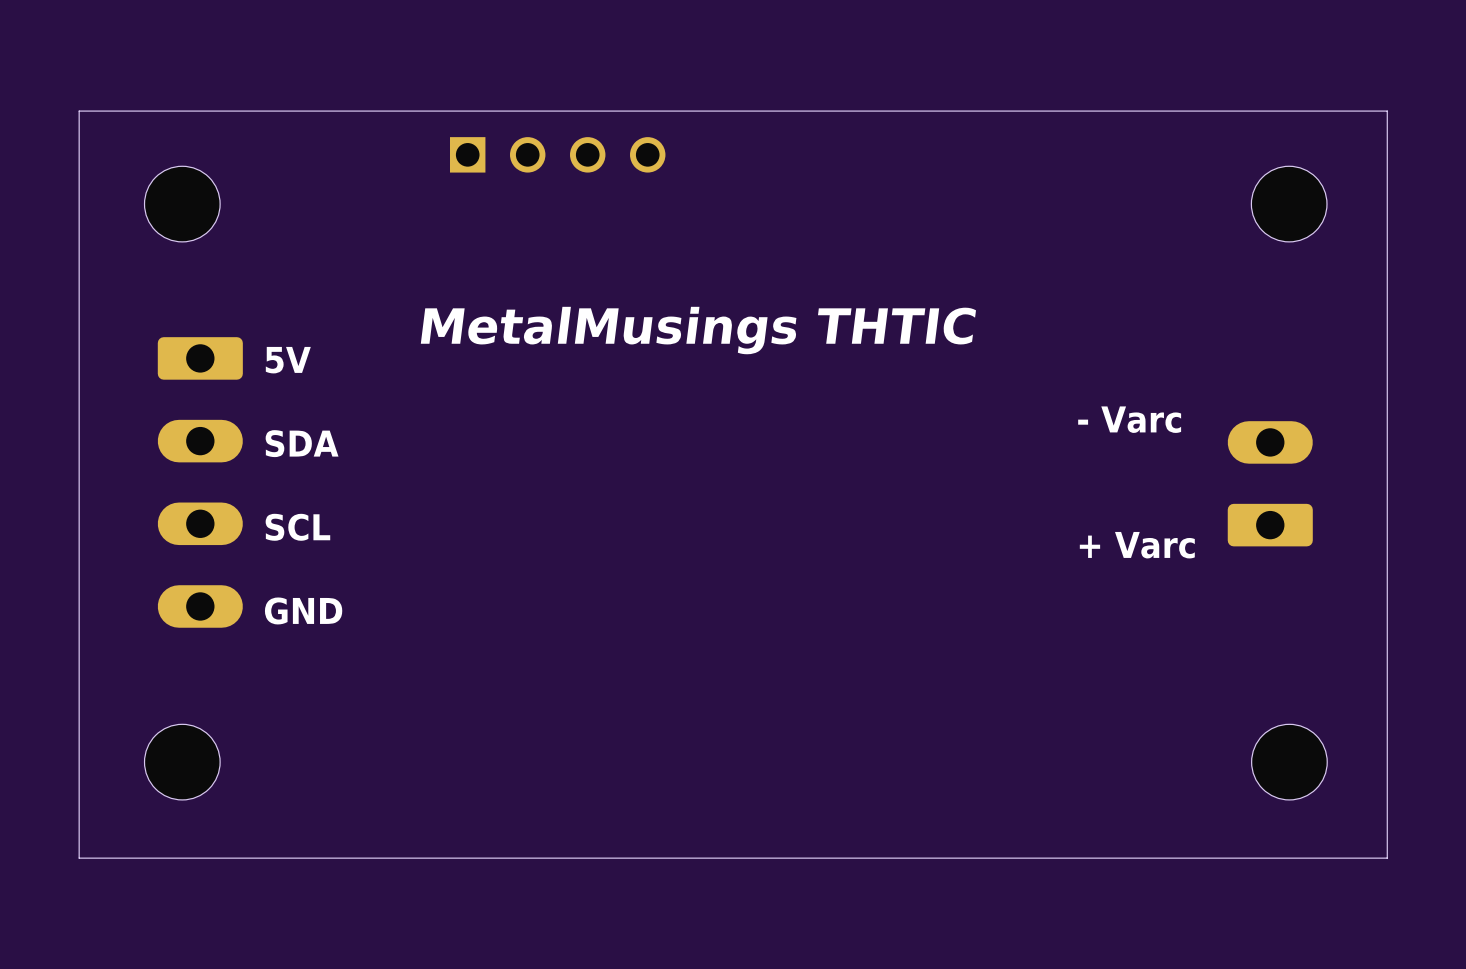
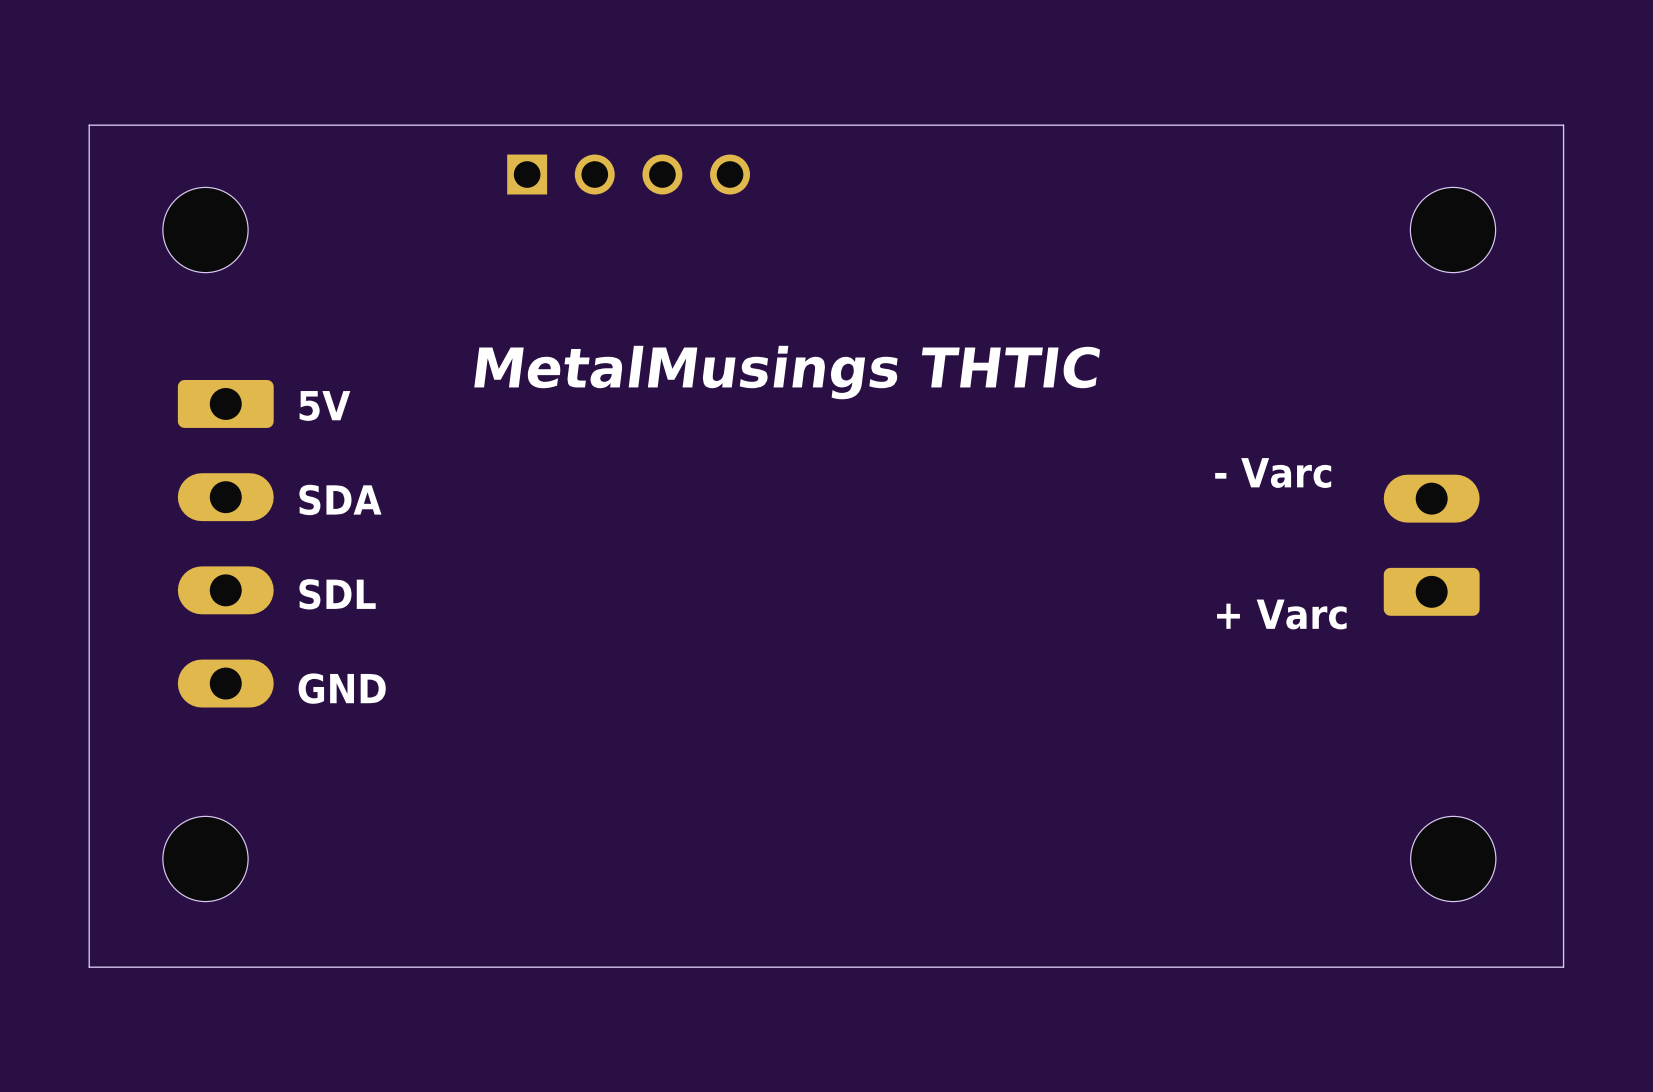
text: SCL (297, 527) -> SDL (337, 594)

